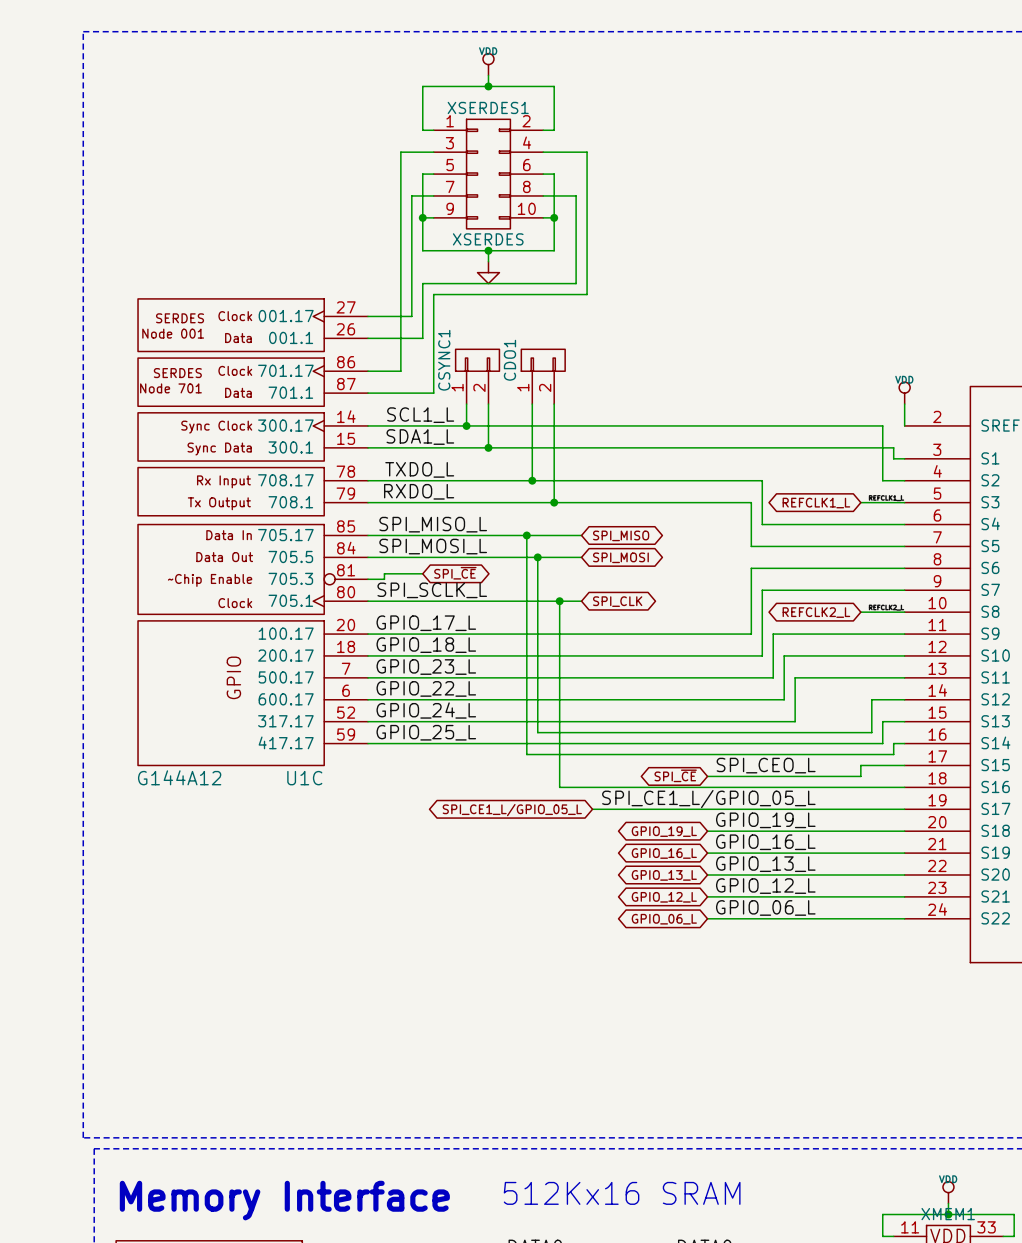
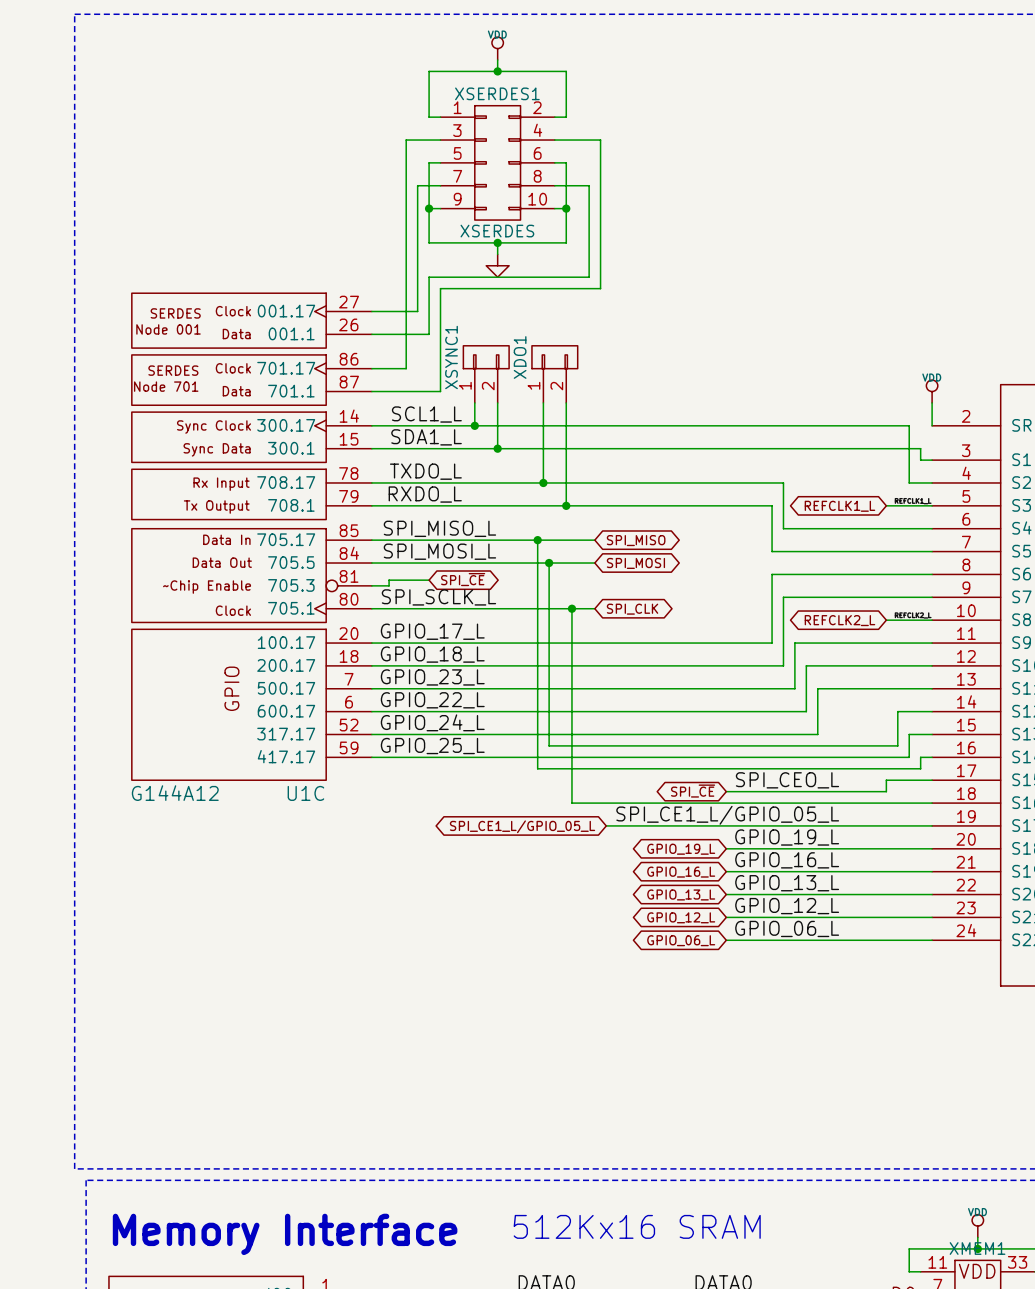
CSYNC1 name: CSYNC1 (444, 360) -> XSYNC1 (451, 357)
CDO1 name: CDO1 (509, 360) -> XDO1 (520, 357)

